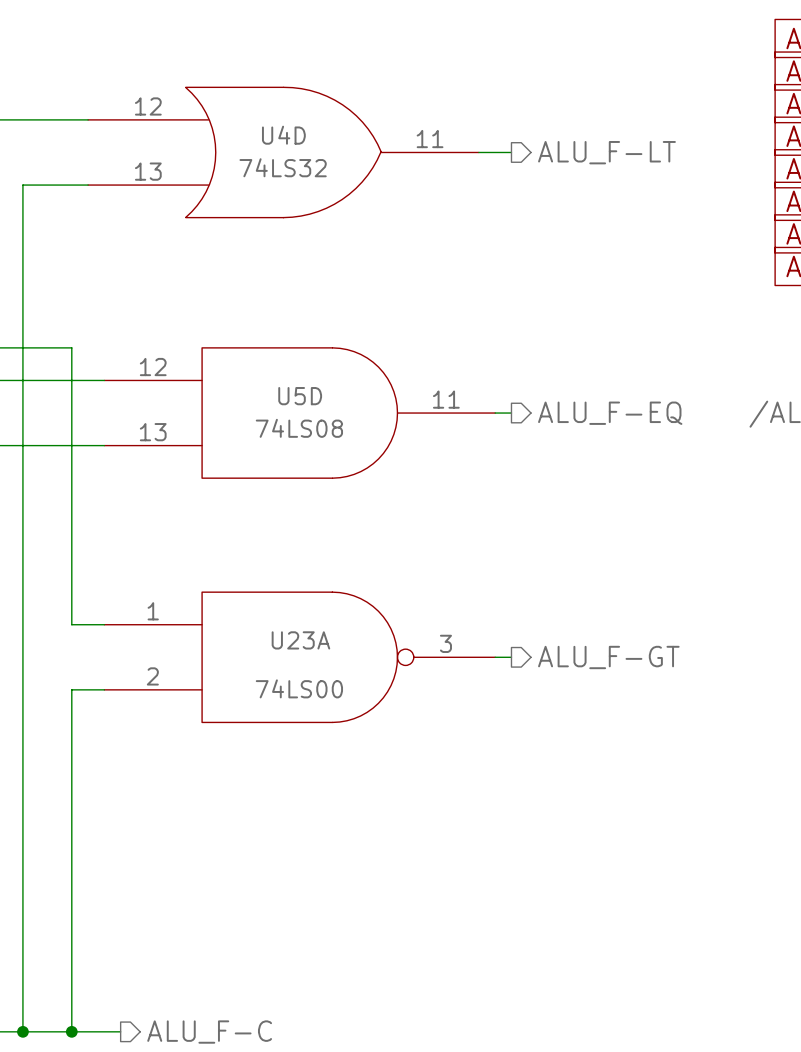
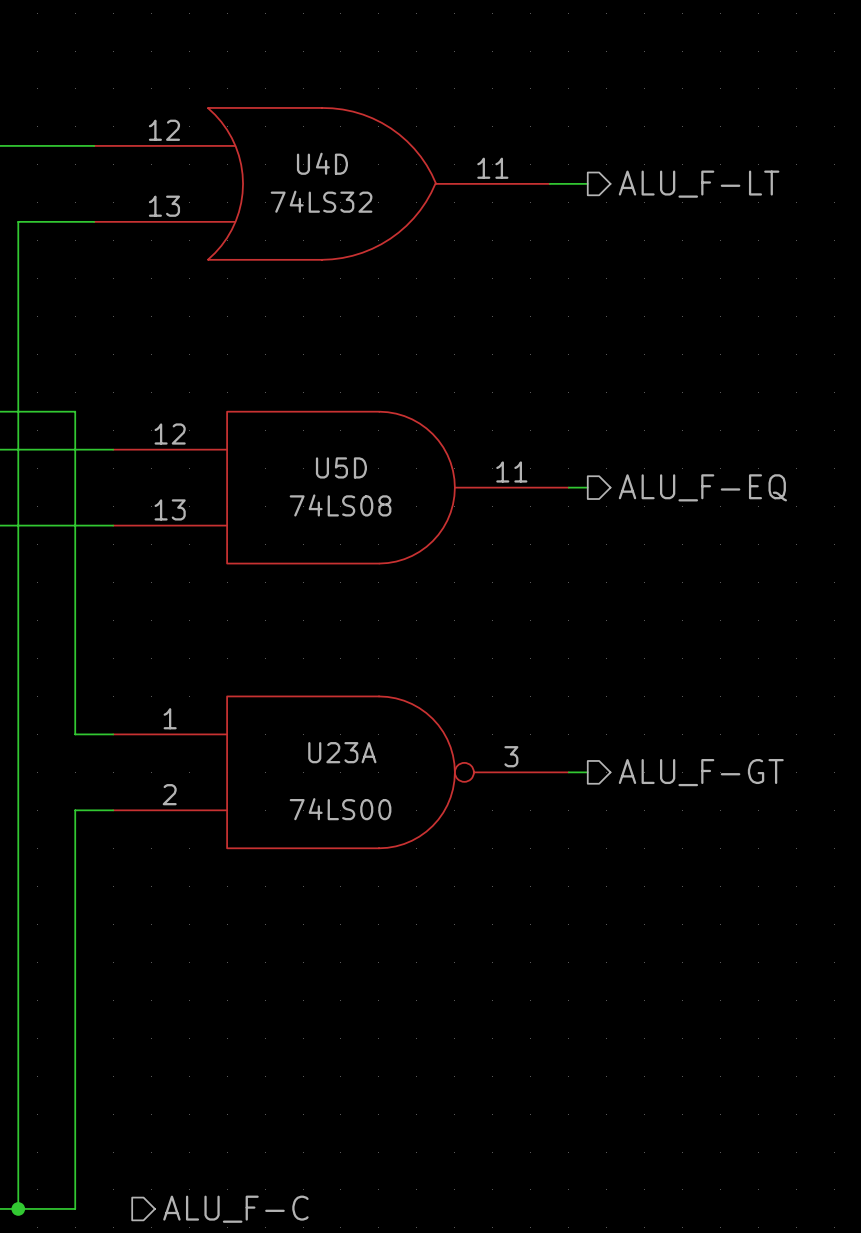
wire: (71, 1031) (120, 1031) -> none
junction: (71, 1031) -> none

